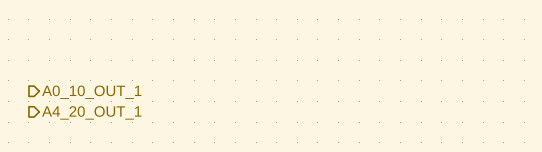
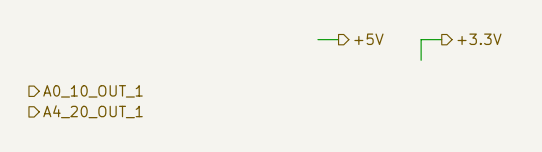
wire: none -> (317, 39) (338, 39)
hierarchical label: none -> +5V (368, 39)
wire: none -> (441, 39) (421, 39) (421, 60)
hierarchical label: none -> +3.3V (479, 39)

